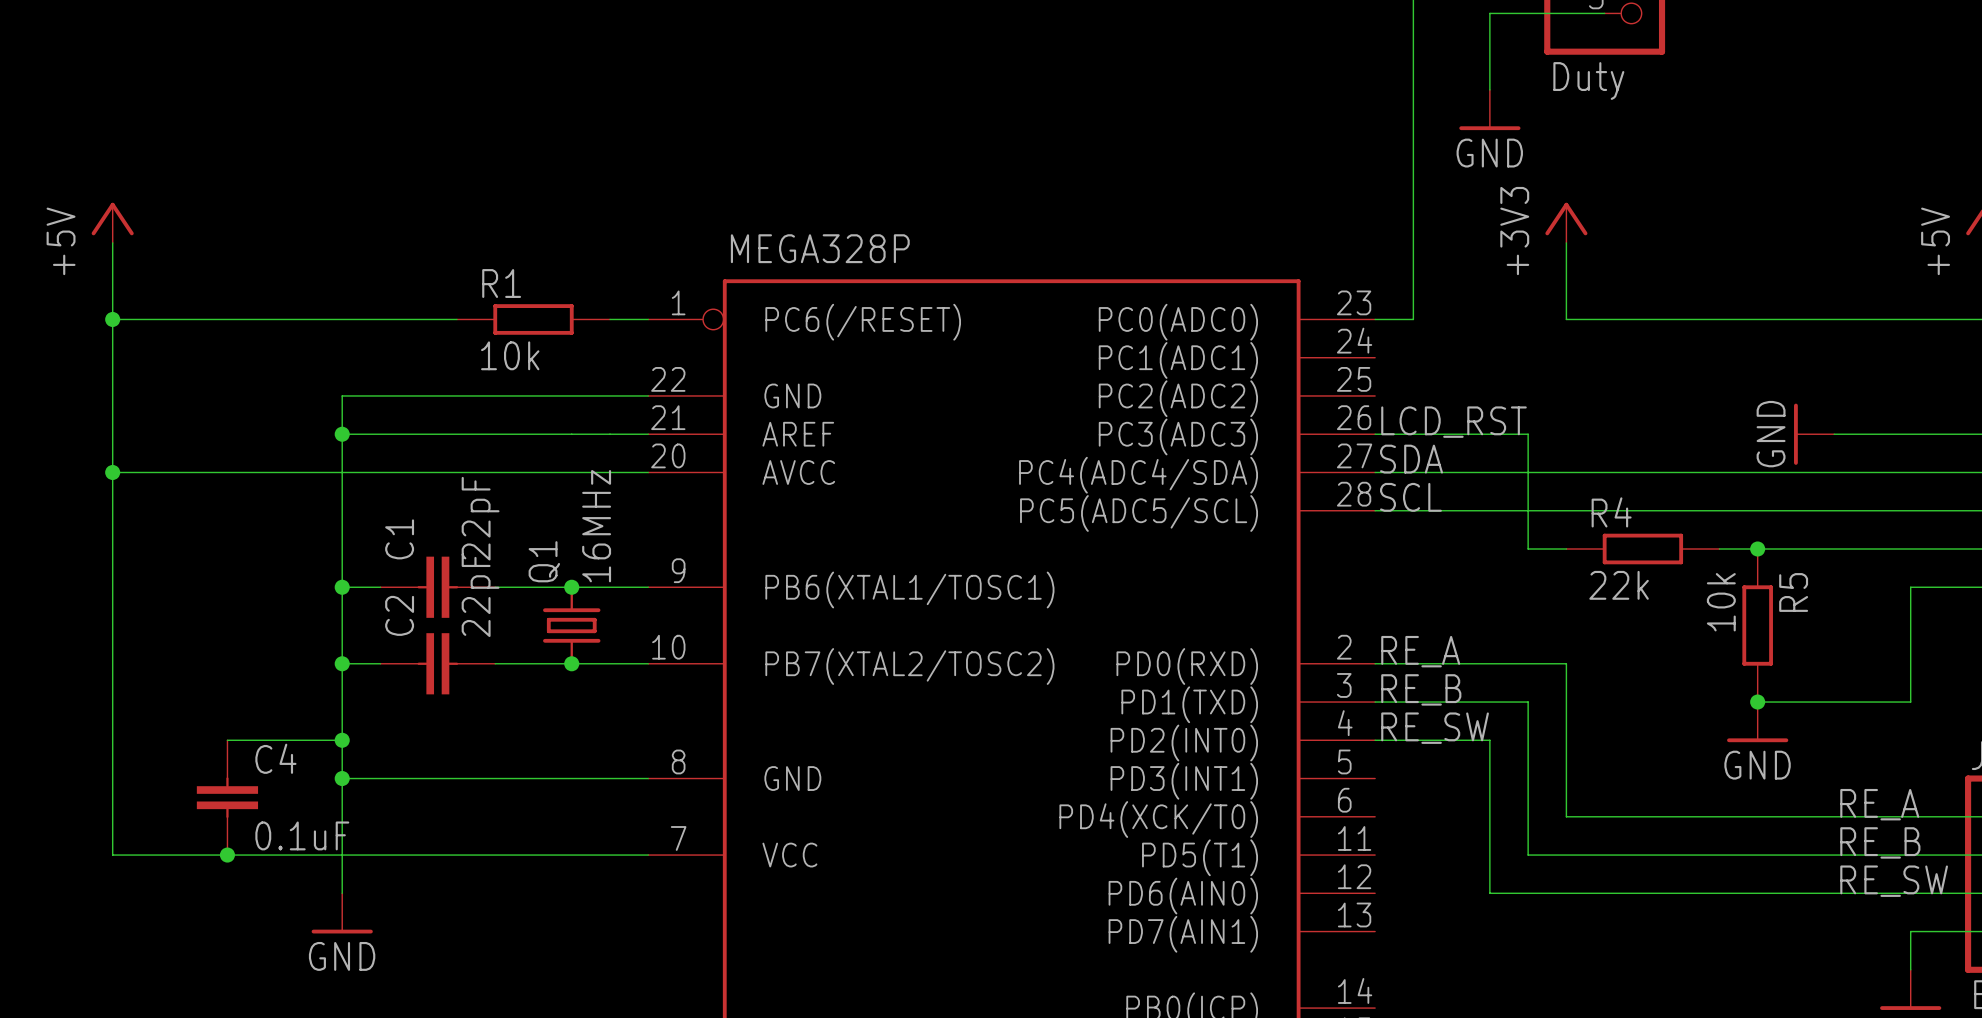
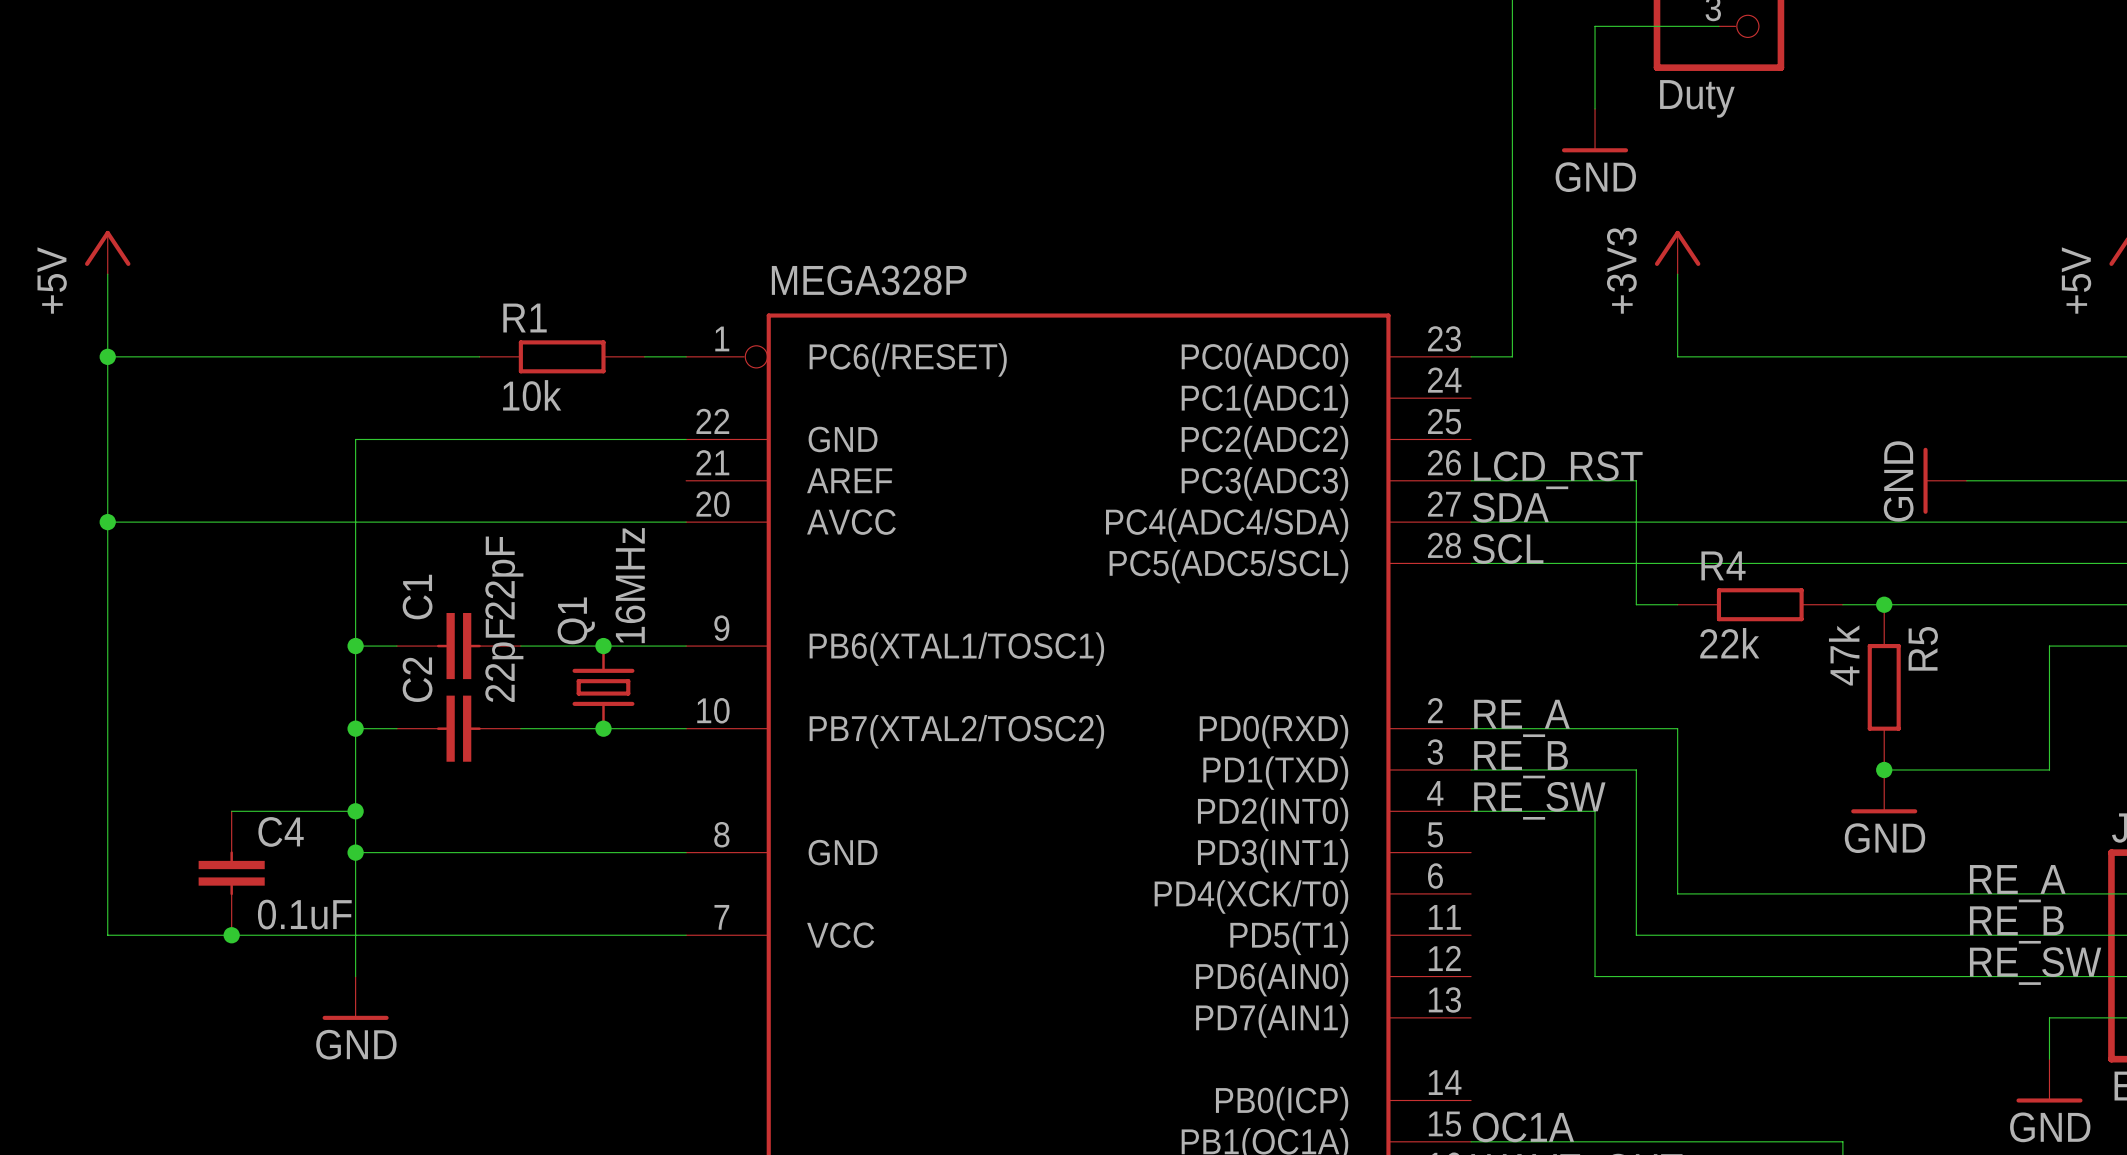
wire: (342, 434) (648, 434) -> none
junction: (342, 434) -> none
R5 value: 10k (1721, 602) -> 47k (1844, 655)

